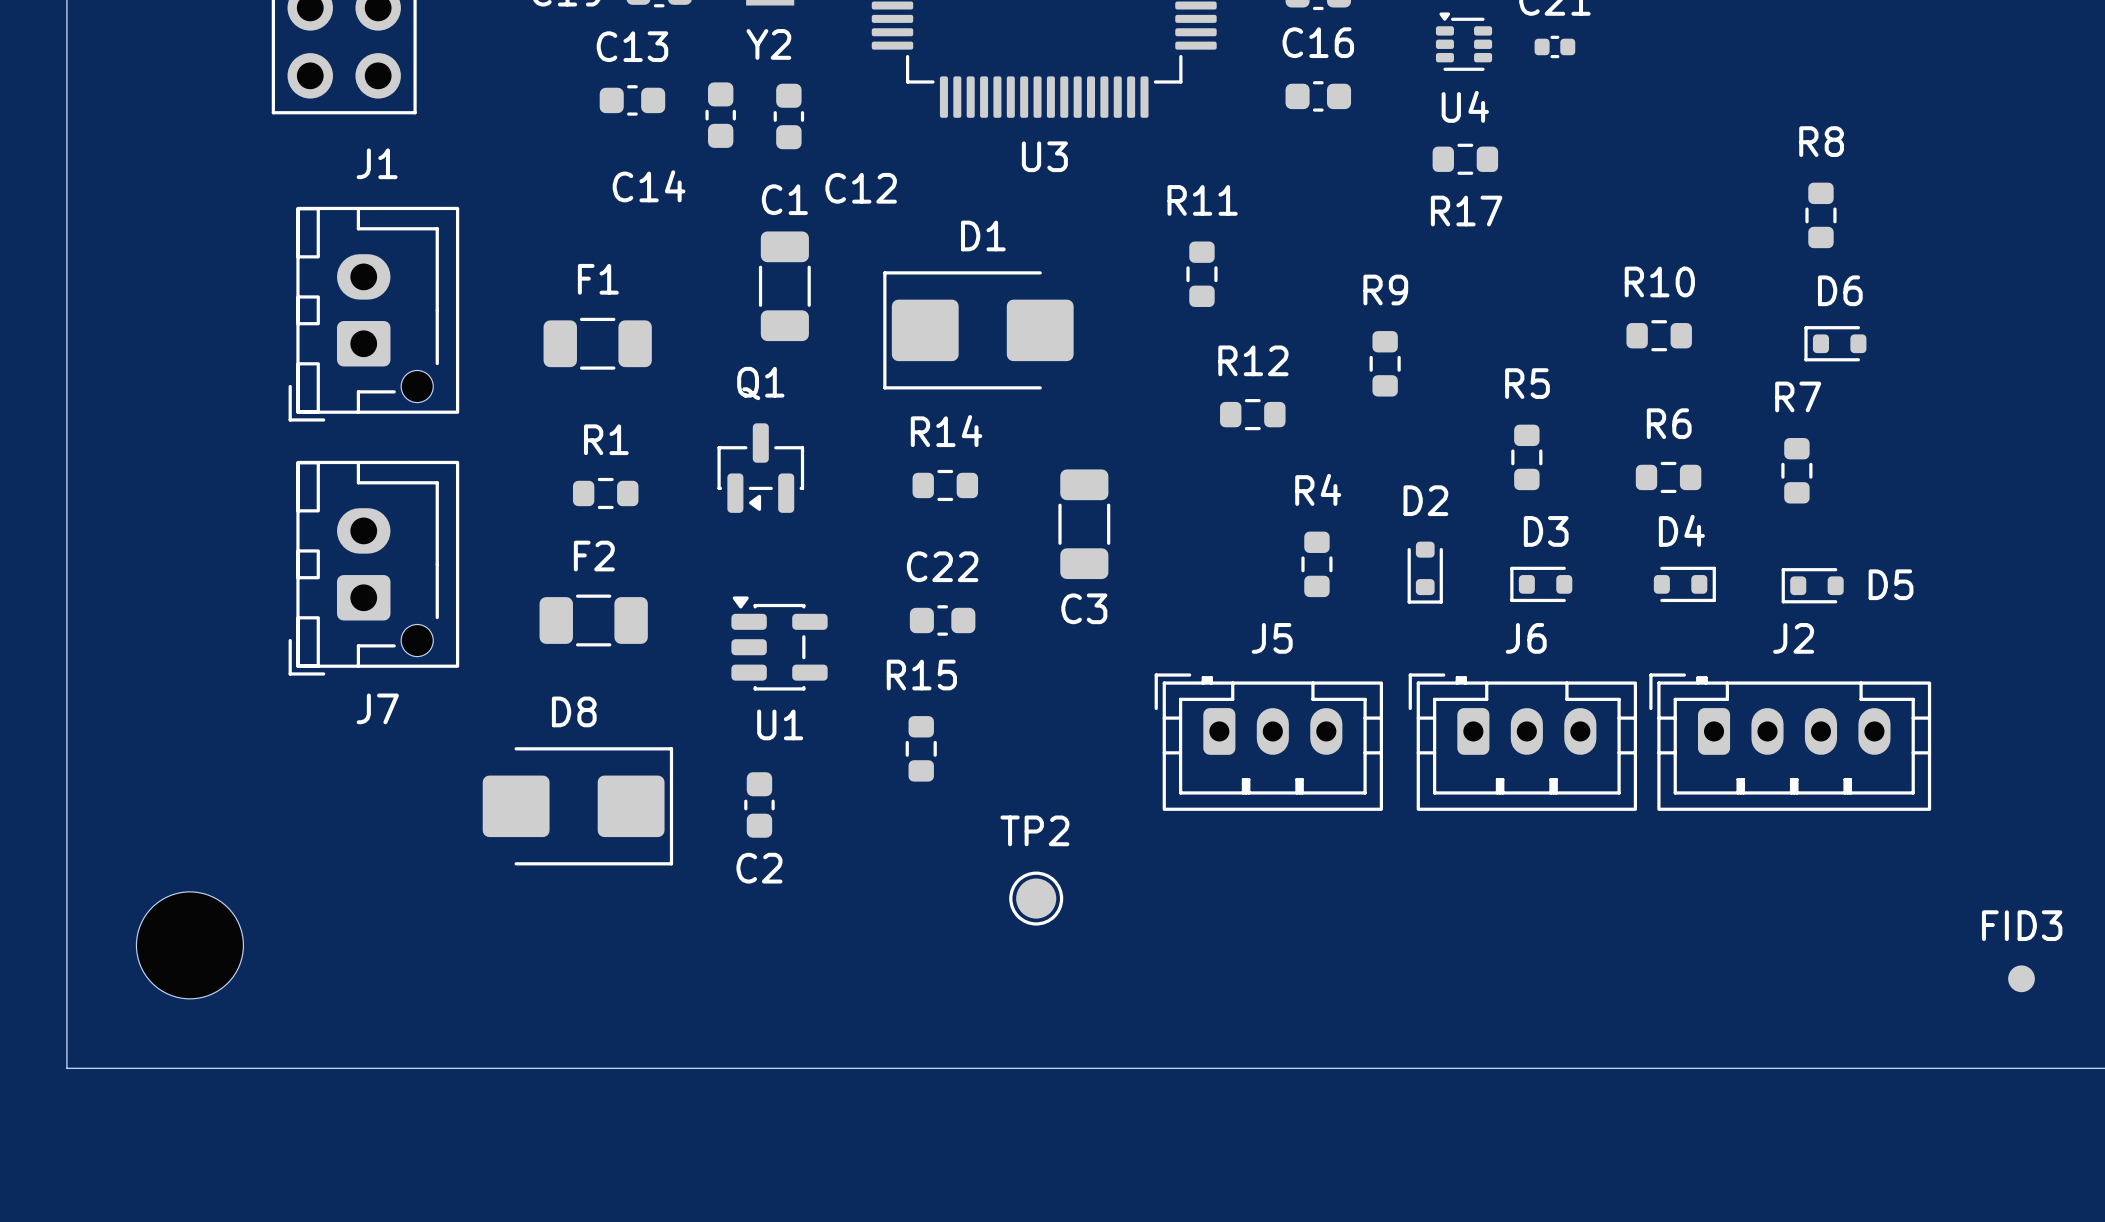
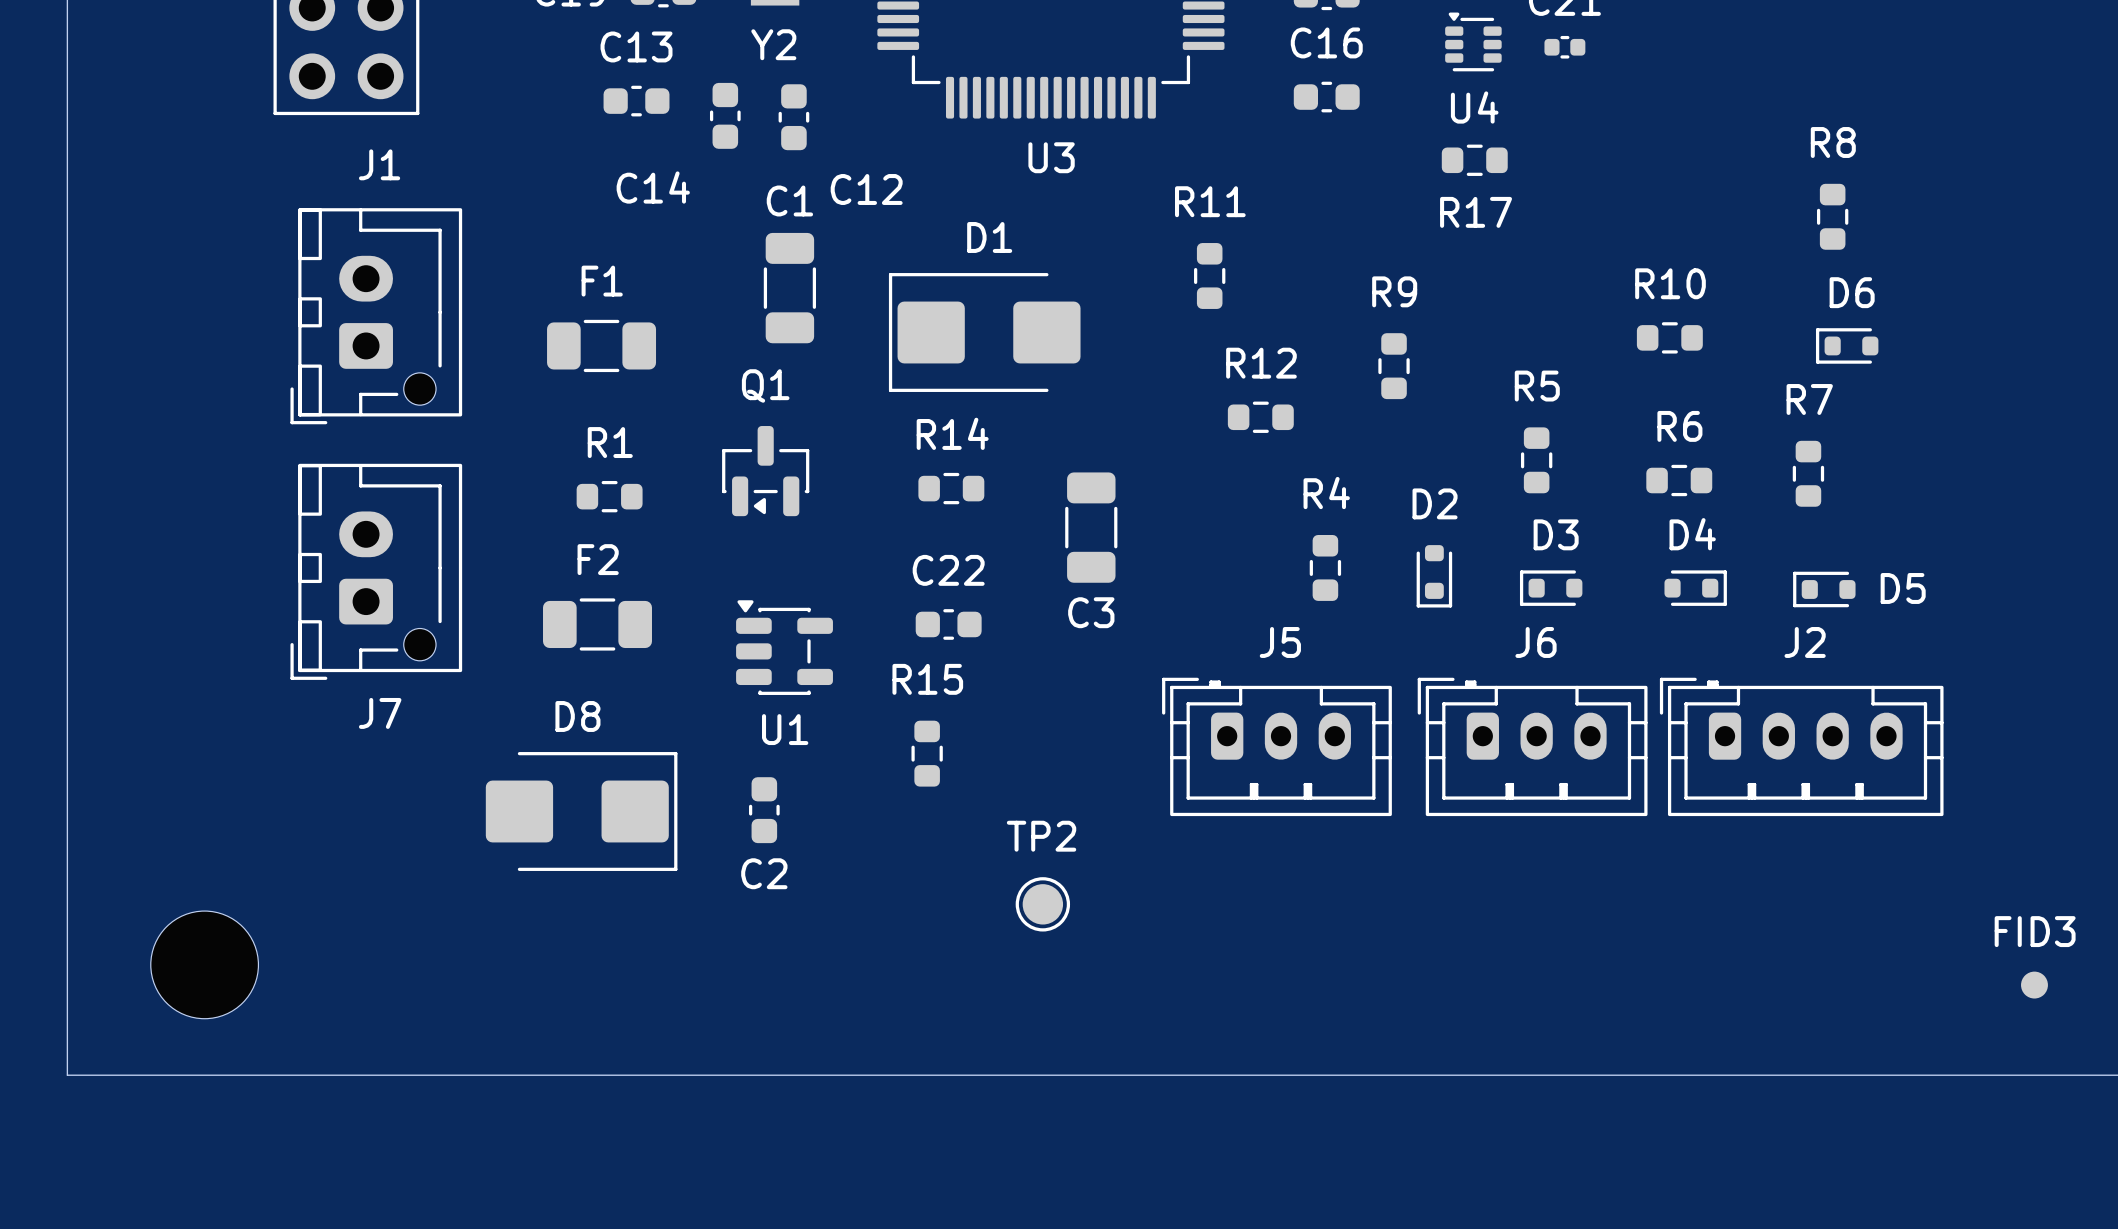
part position: (189, 945) -> (204, 964)

